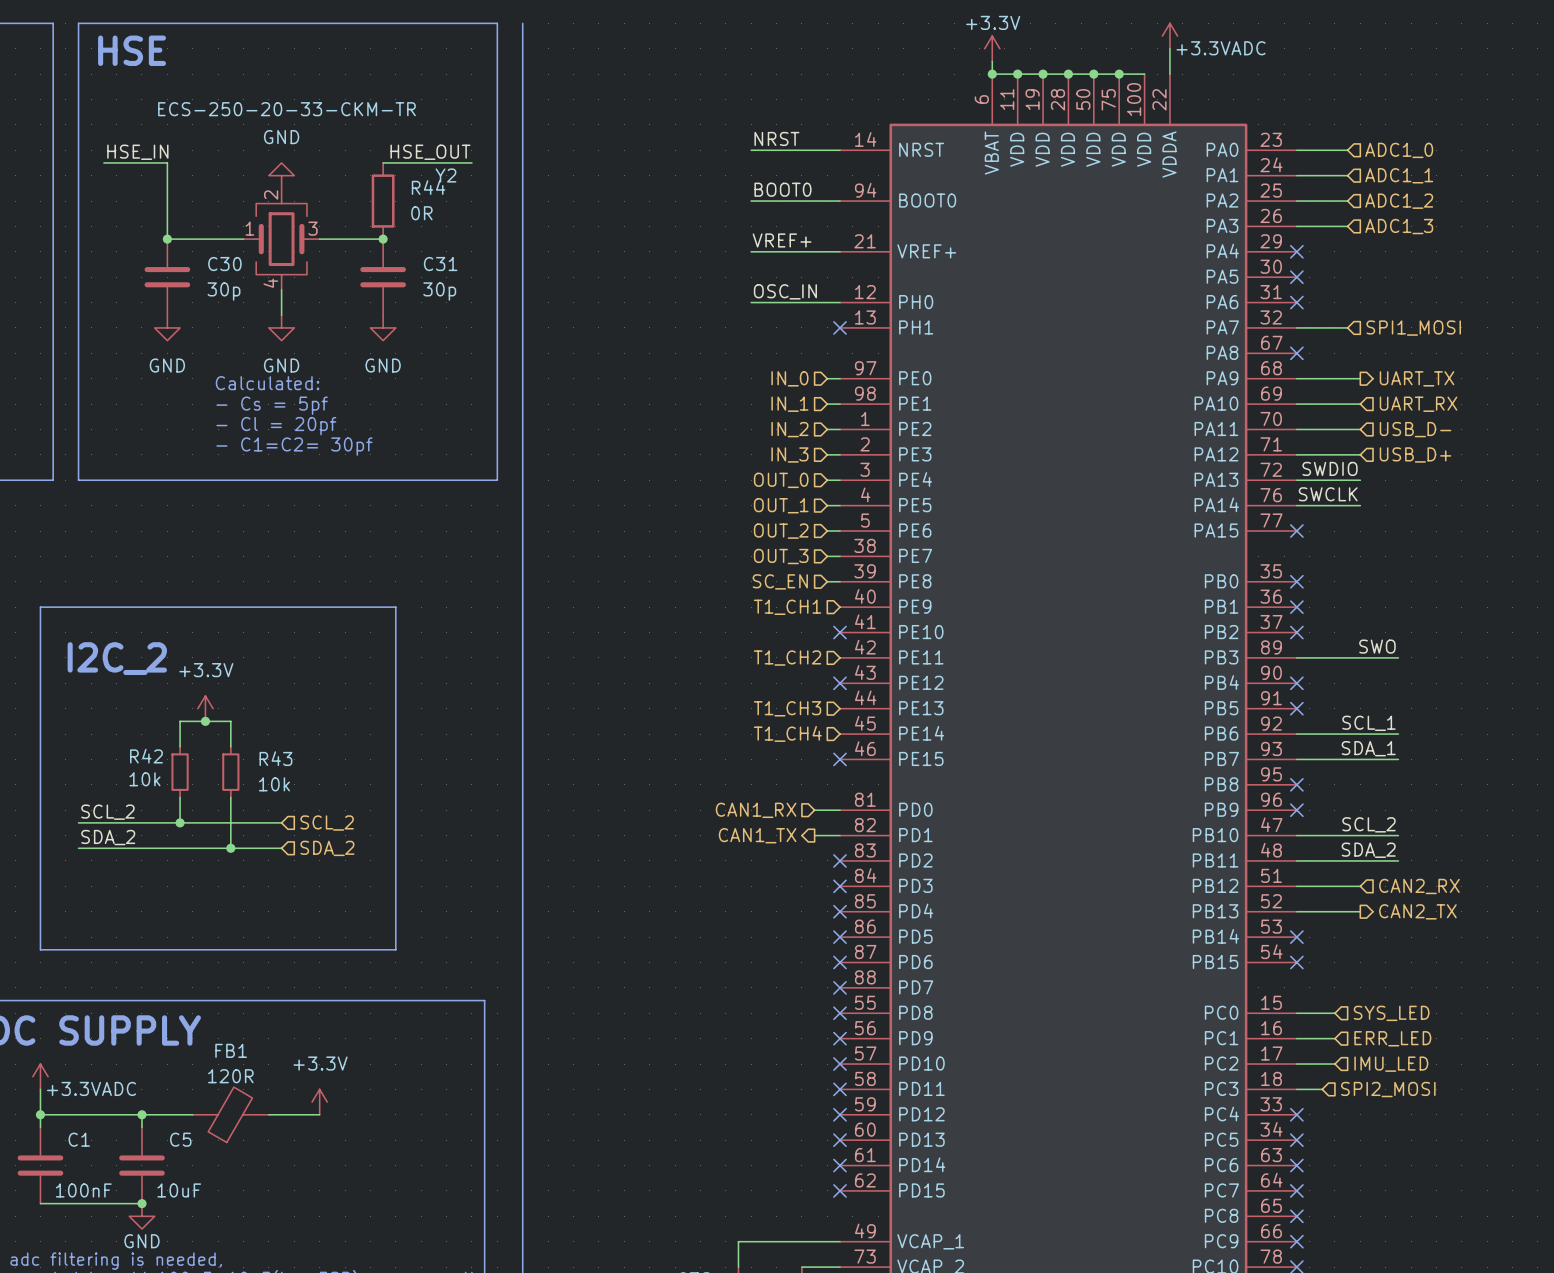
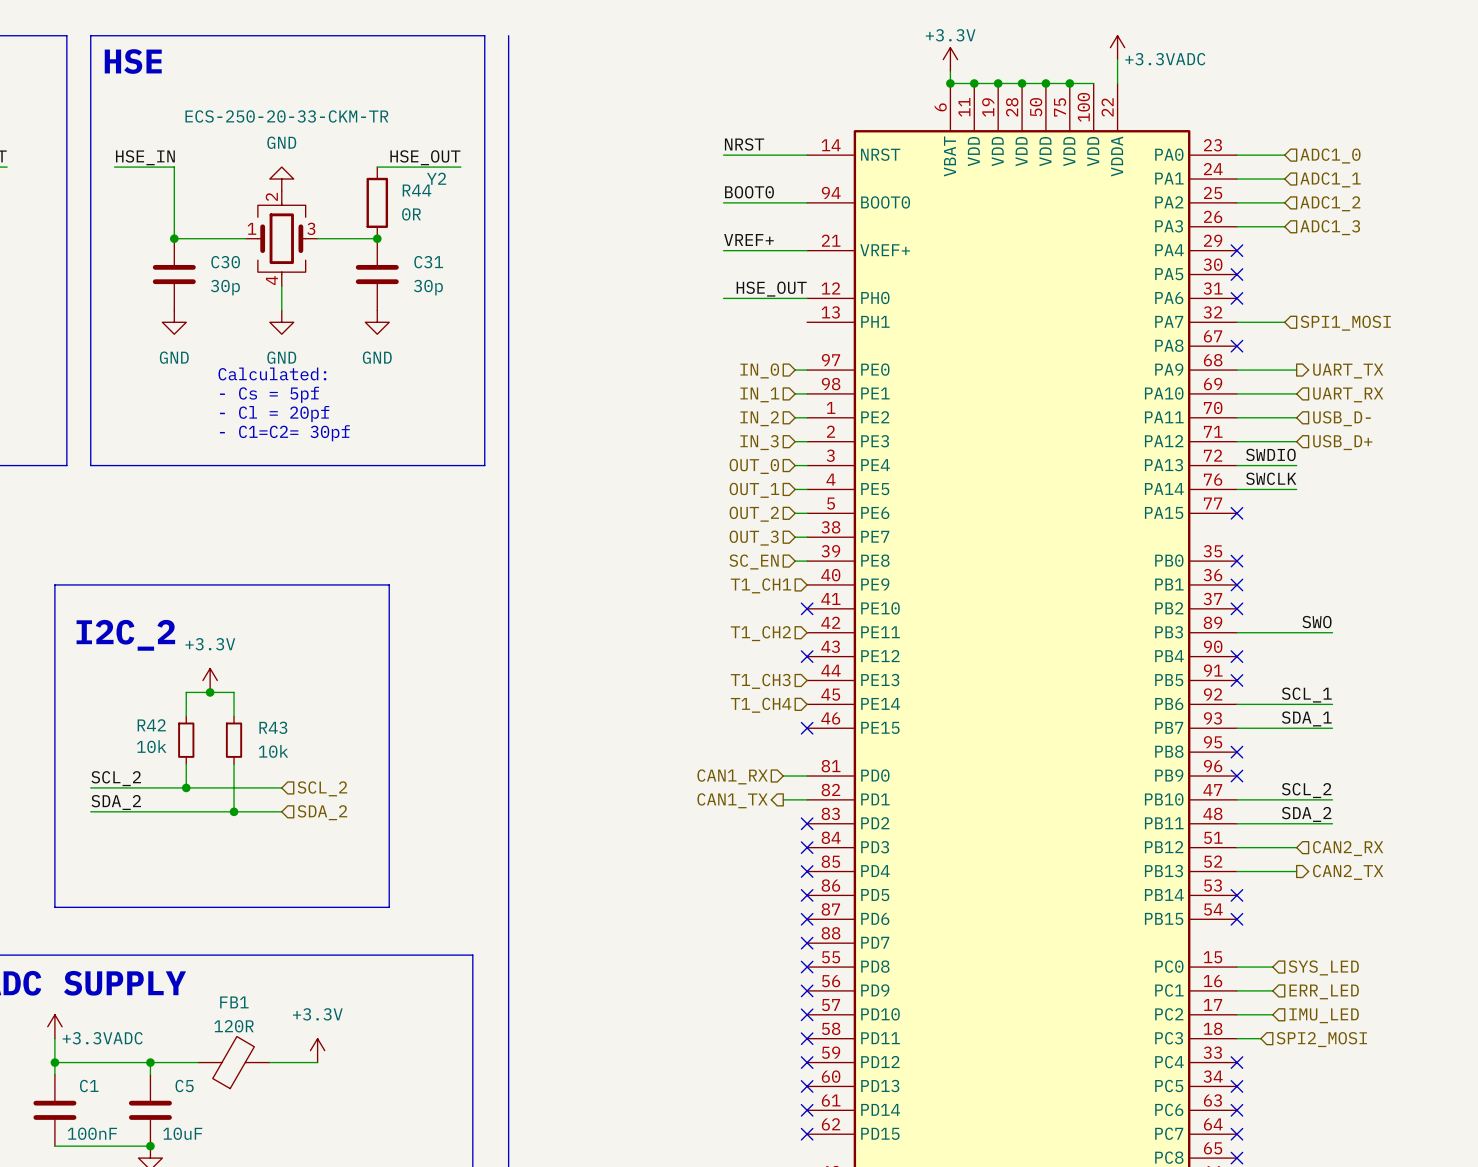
label: OSC_IN (785, 291) -> none
label: none -> HSE_OUT (771, 289)
no-connect mark: (839, 327) -> none

